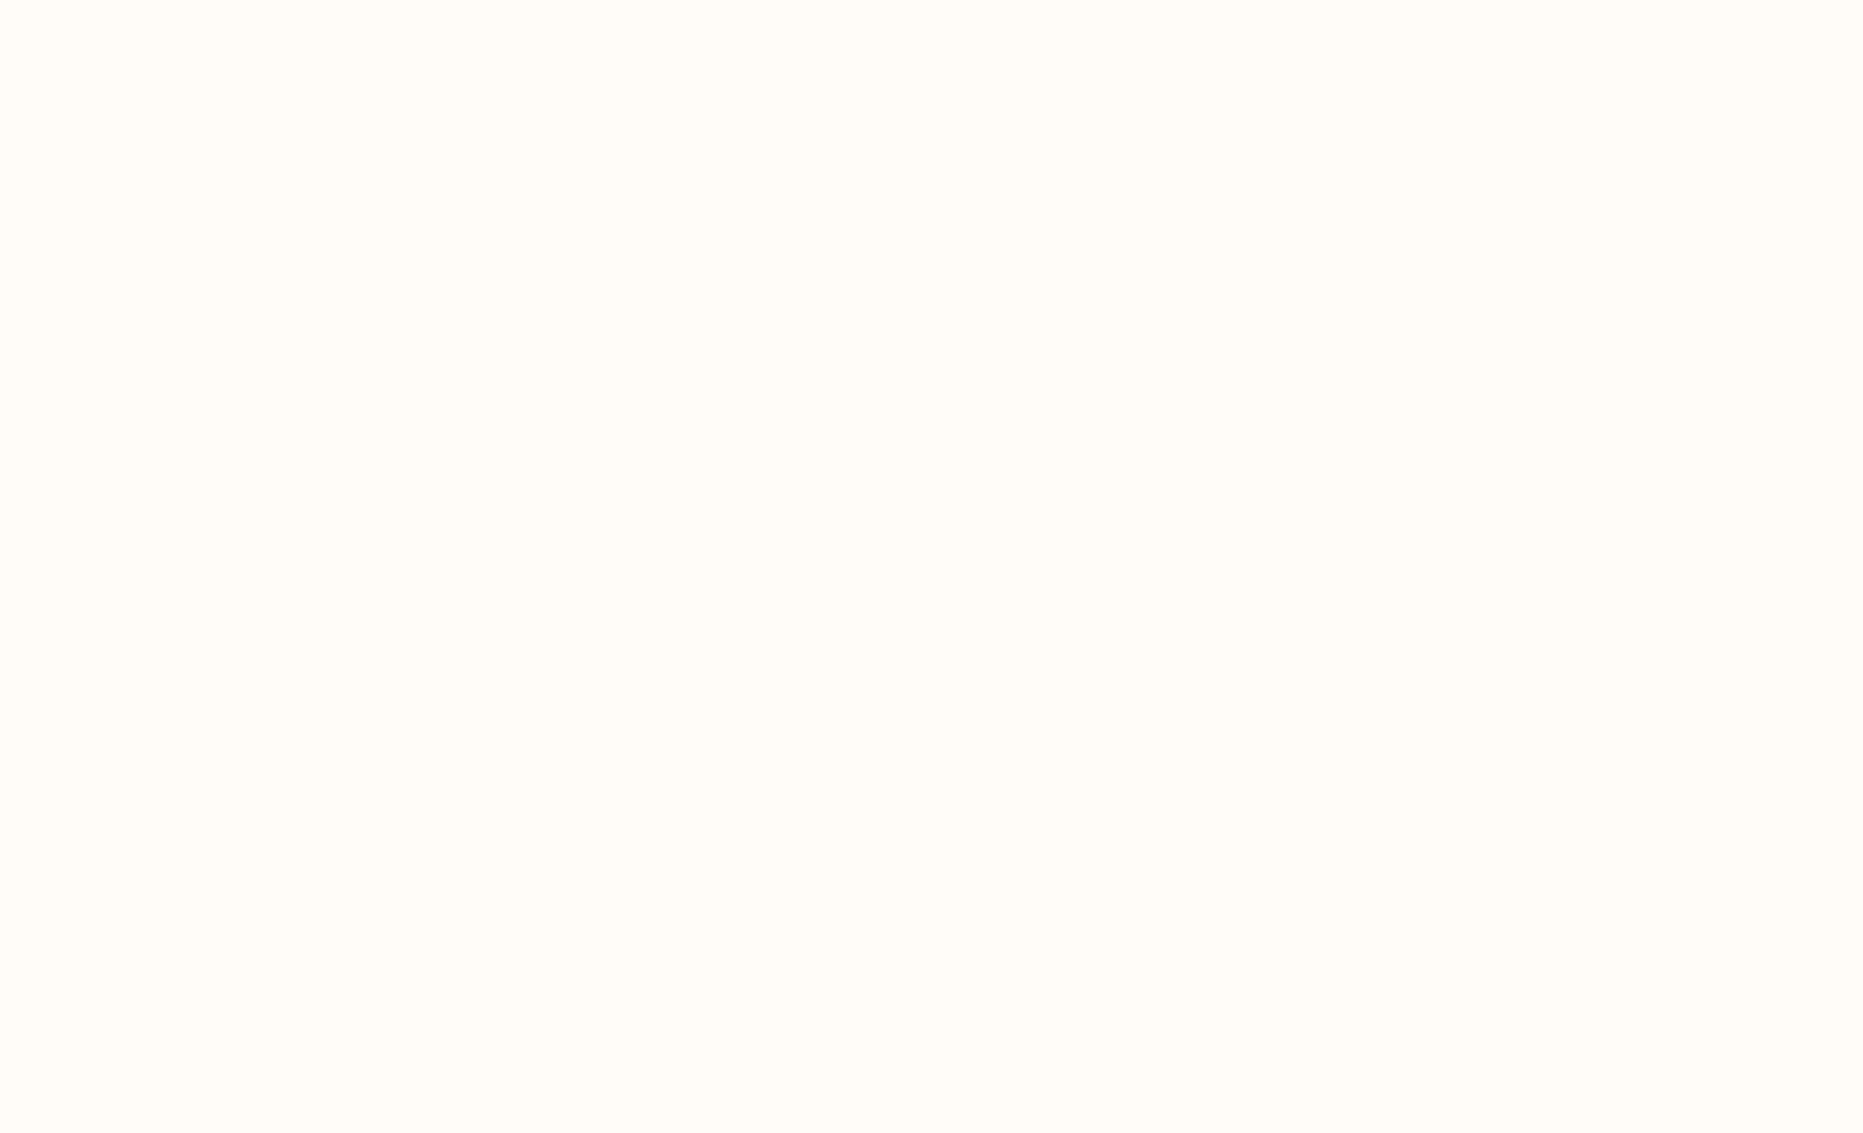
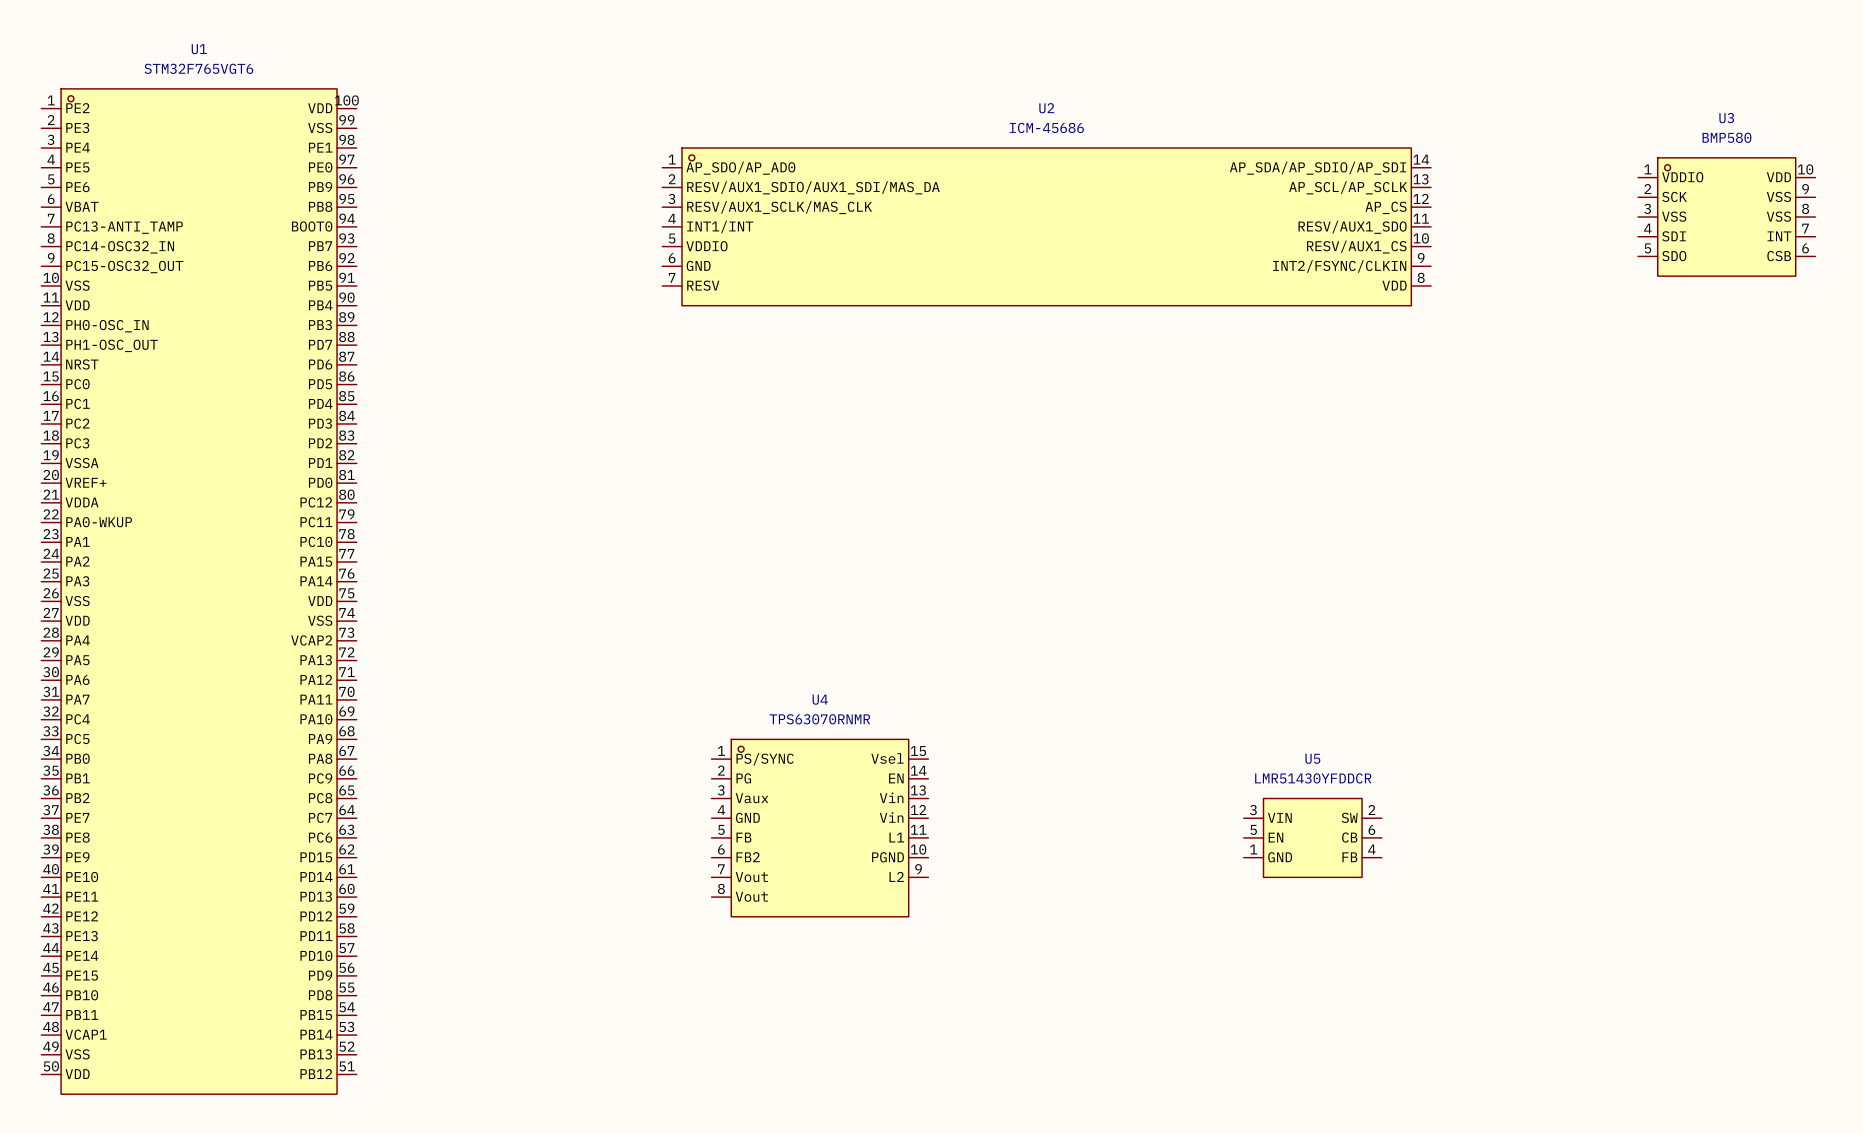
U3: none -> BMP580 (1726, 217)
U2: none -> ICM-45686 (1046, 226)
U1: none -> STM32F765VGT6 (199, 591)
U4: none -> TPS63070RNMR (819, 828)
U5: none -> LMR51430YFDDCR (1312, 837)

